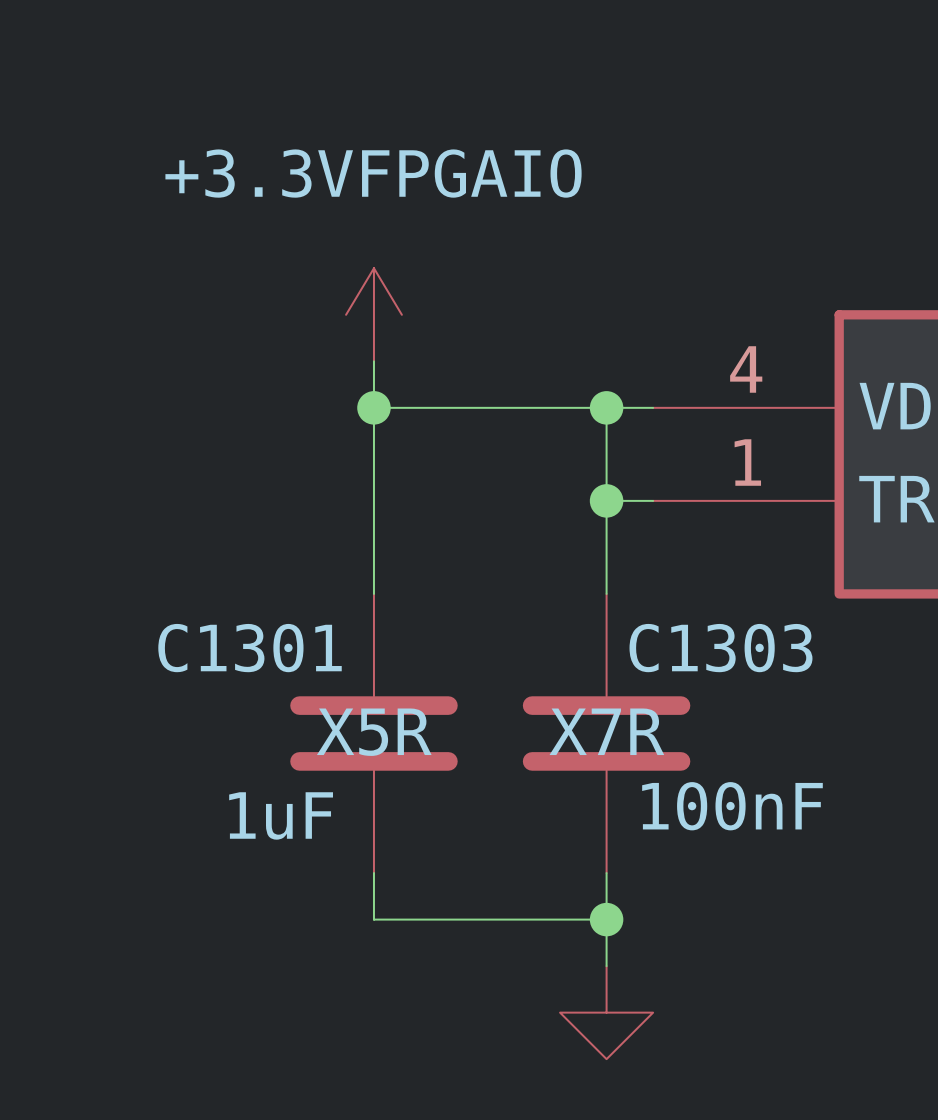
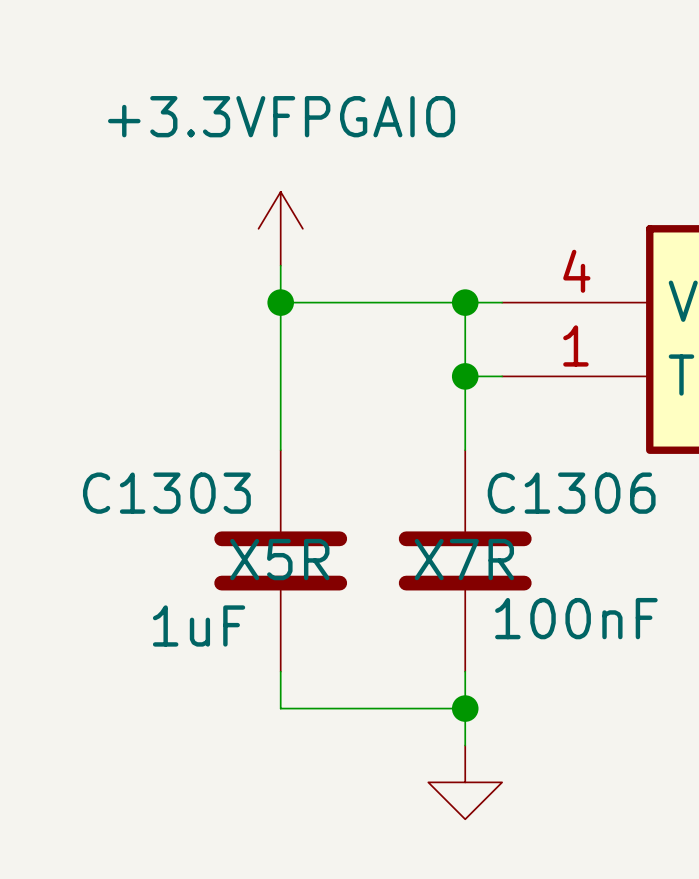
C1301 name: C1301 (250, 648) -> C1303 (166, 493)
C1303 name: C1303 (720, 648) -> C1306 (571, 493)

